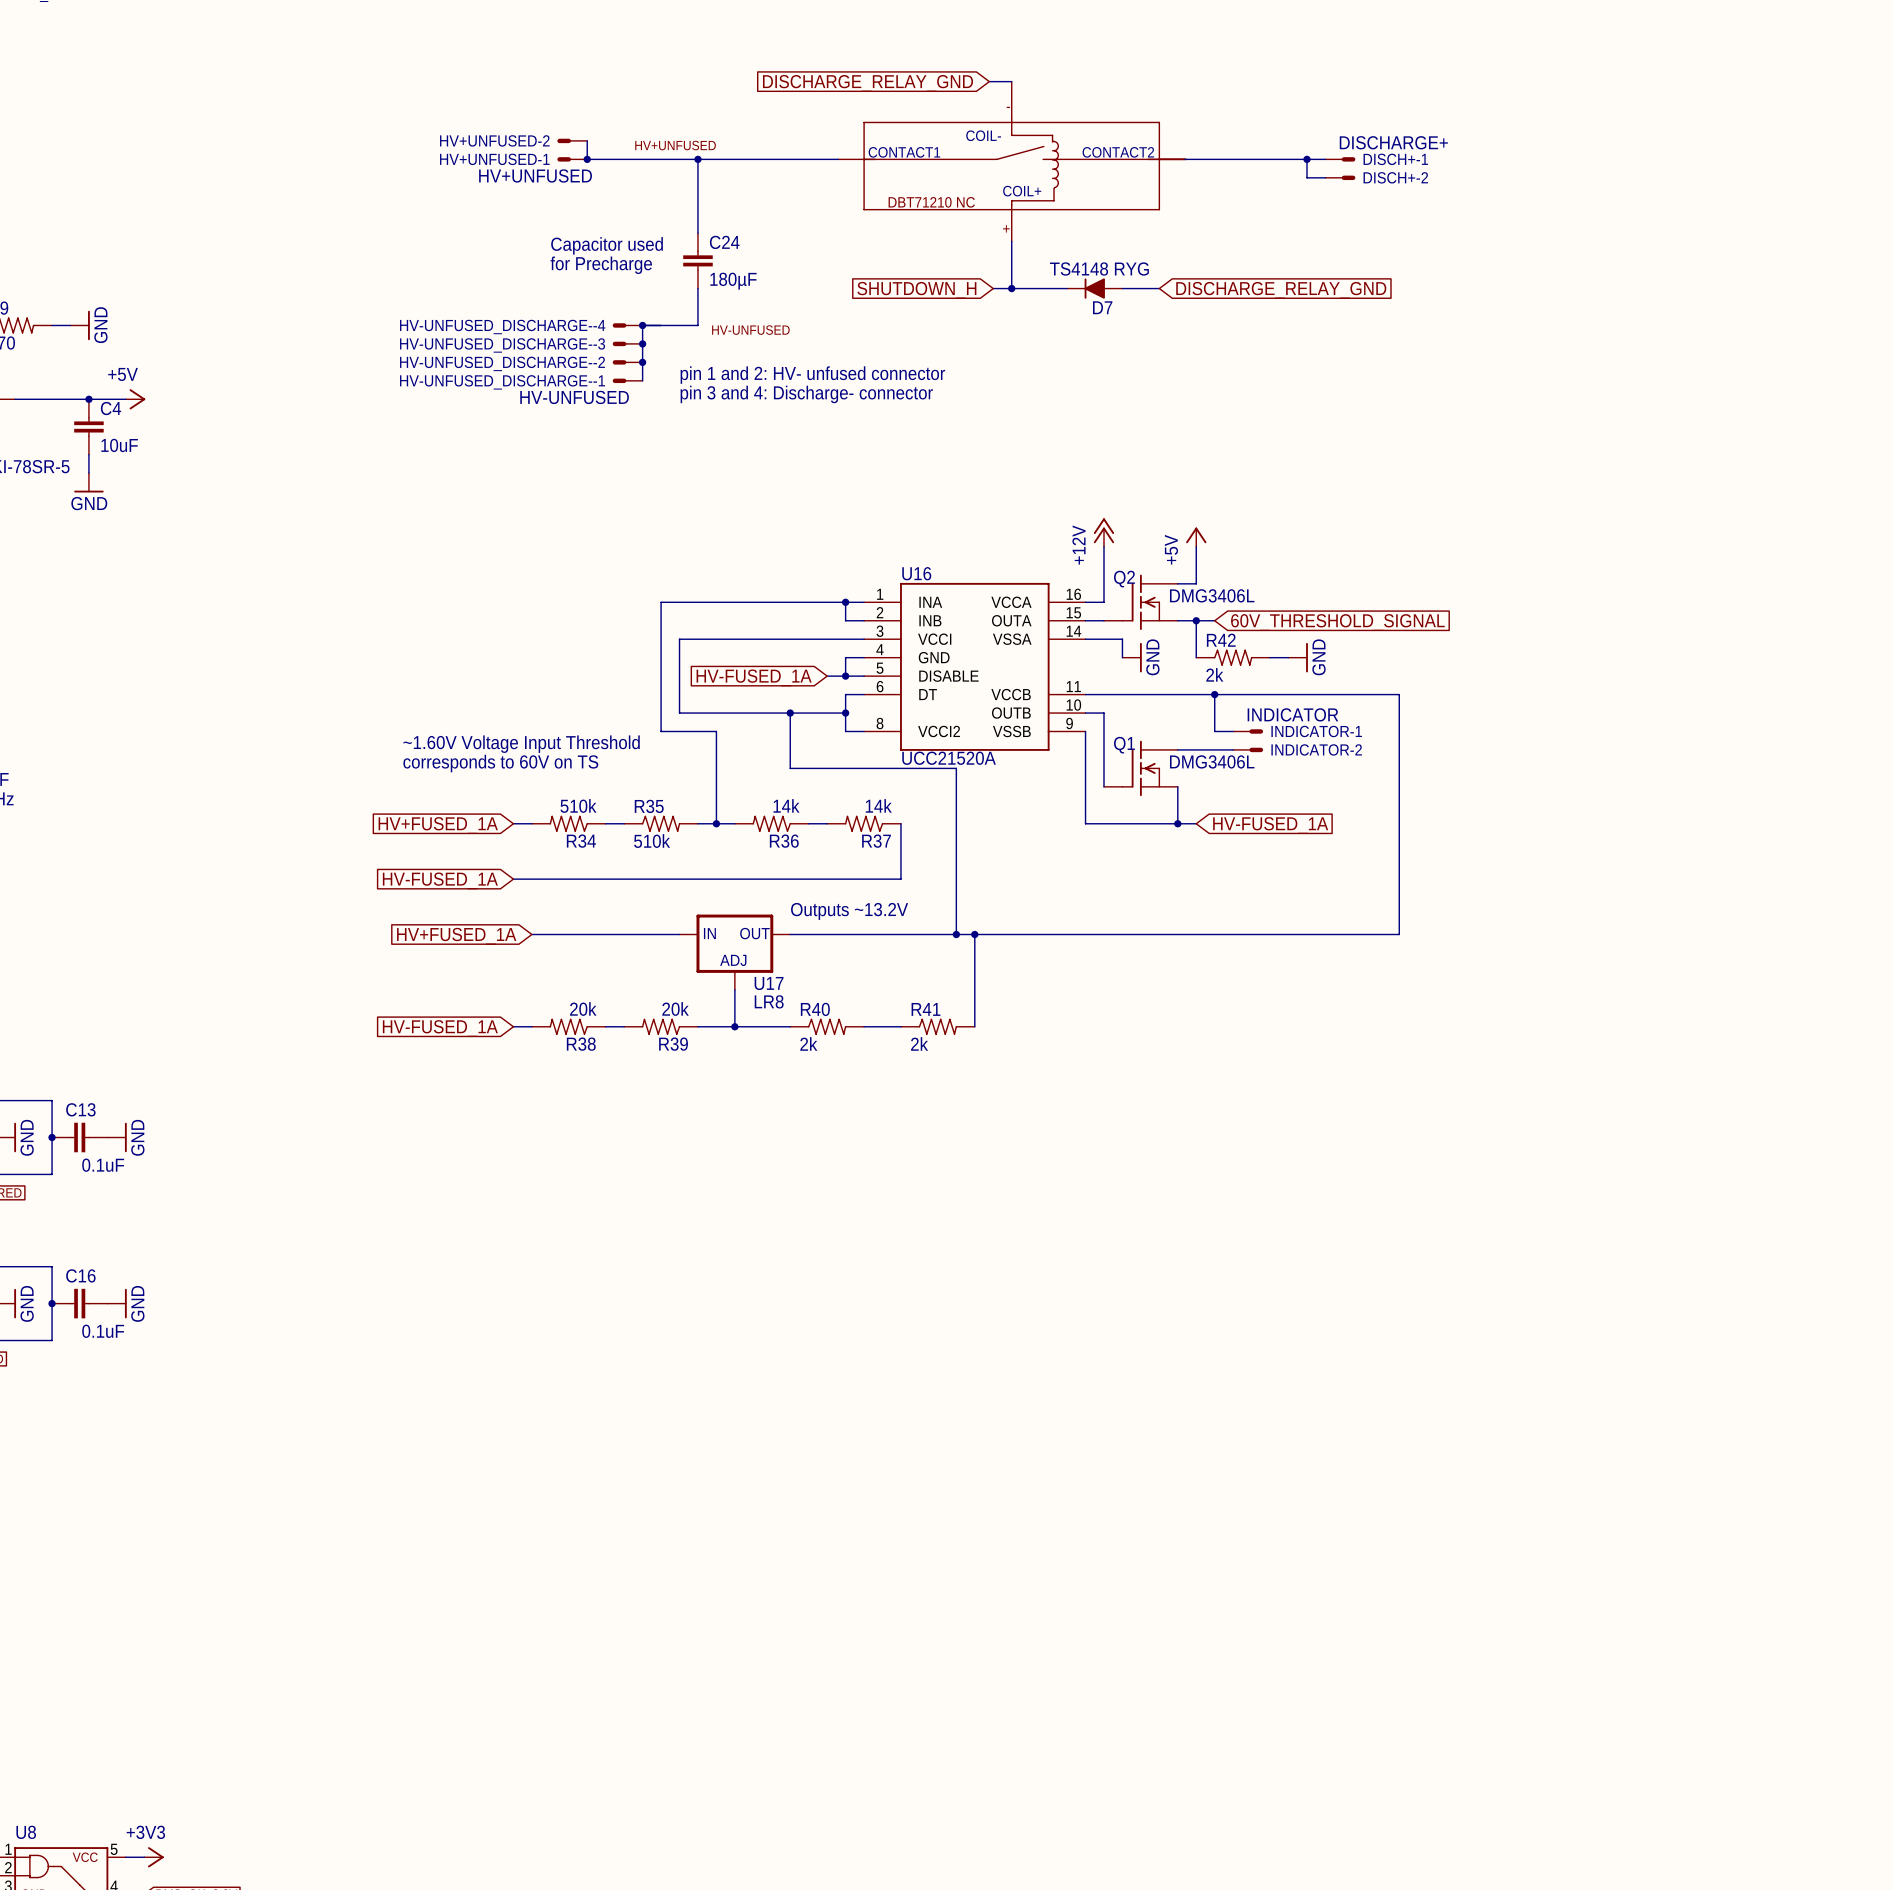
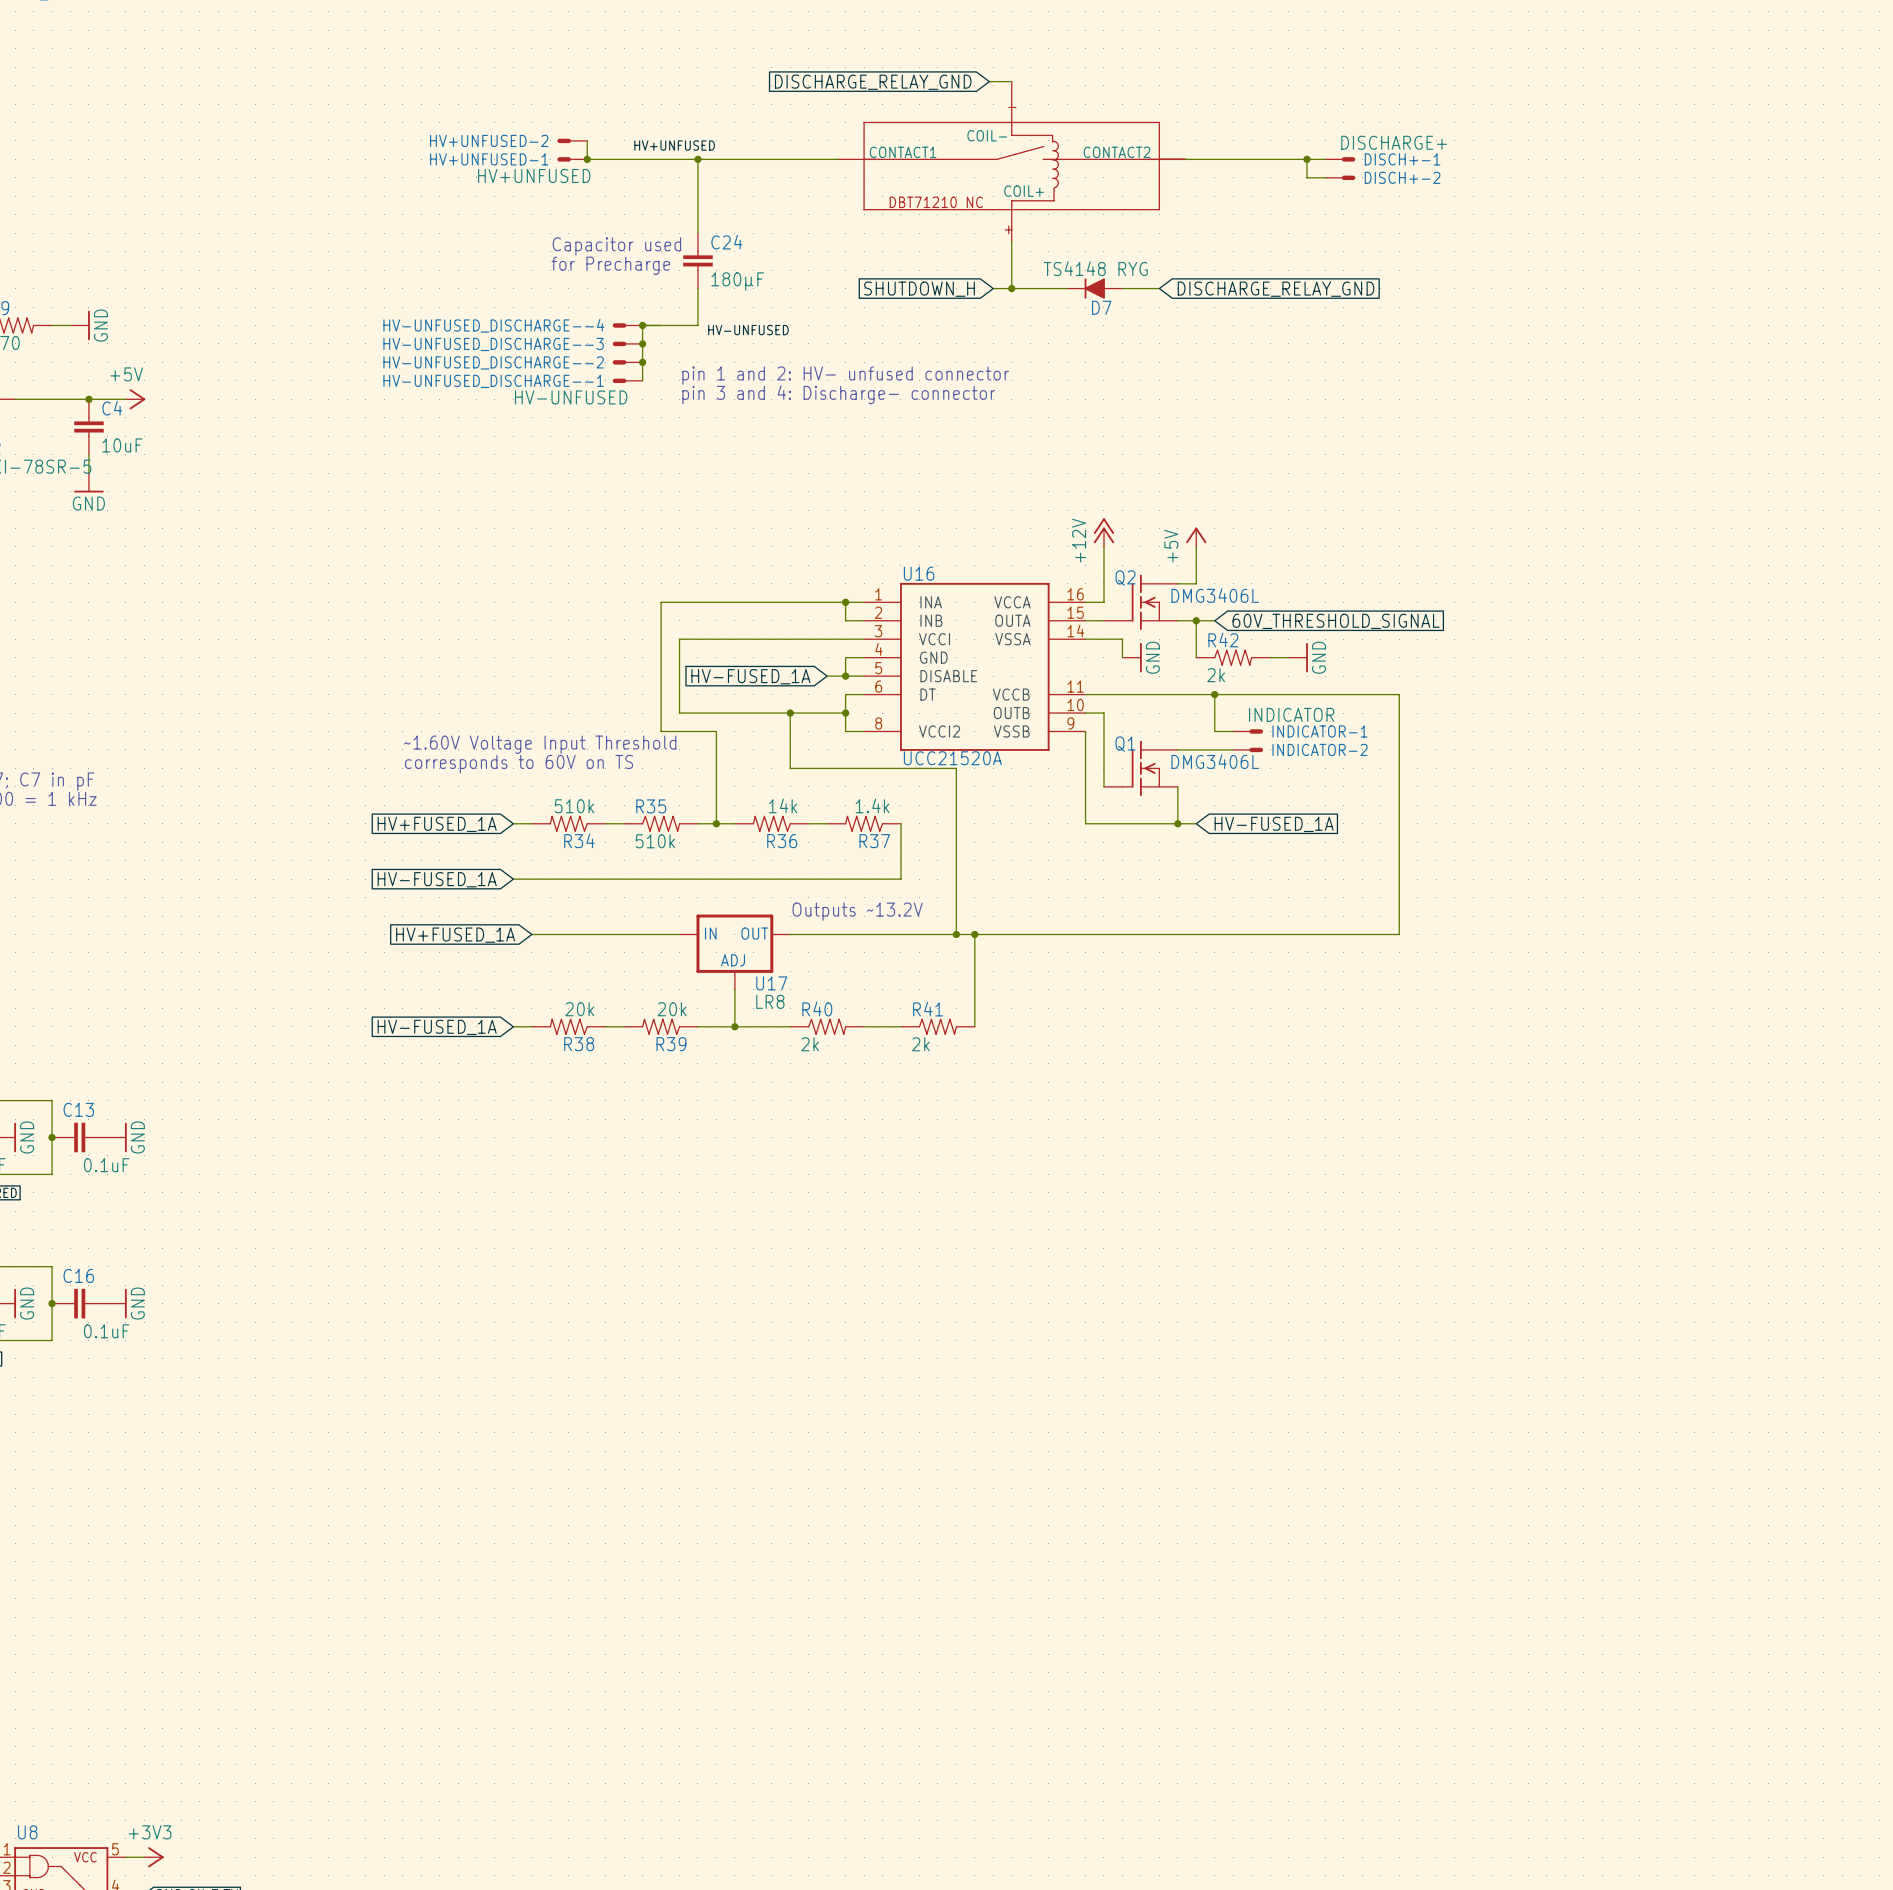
R37 value: 14k (878, 805) -> 1.4k (872, 805)

